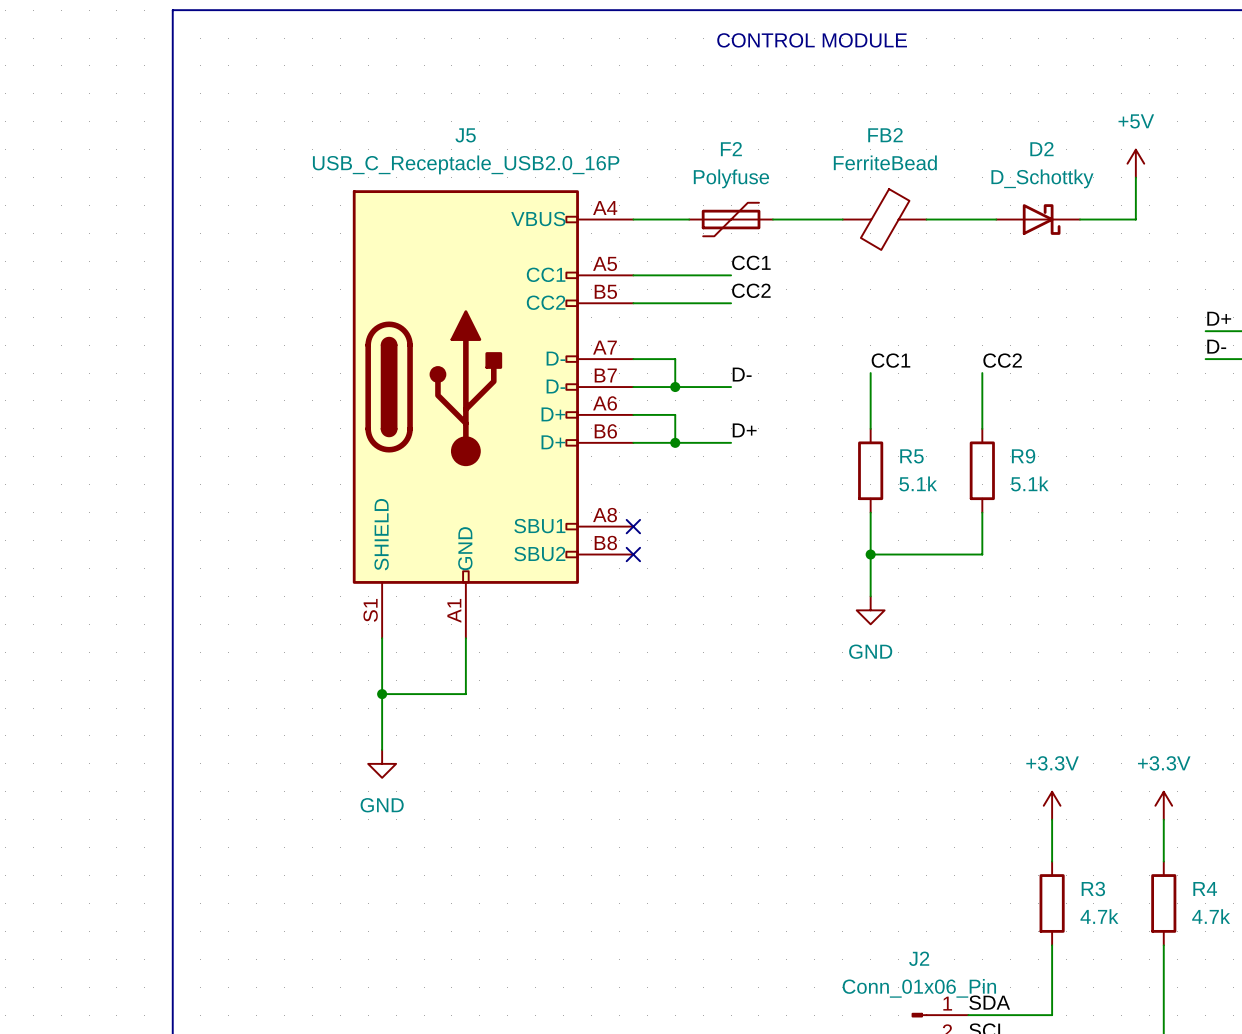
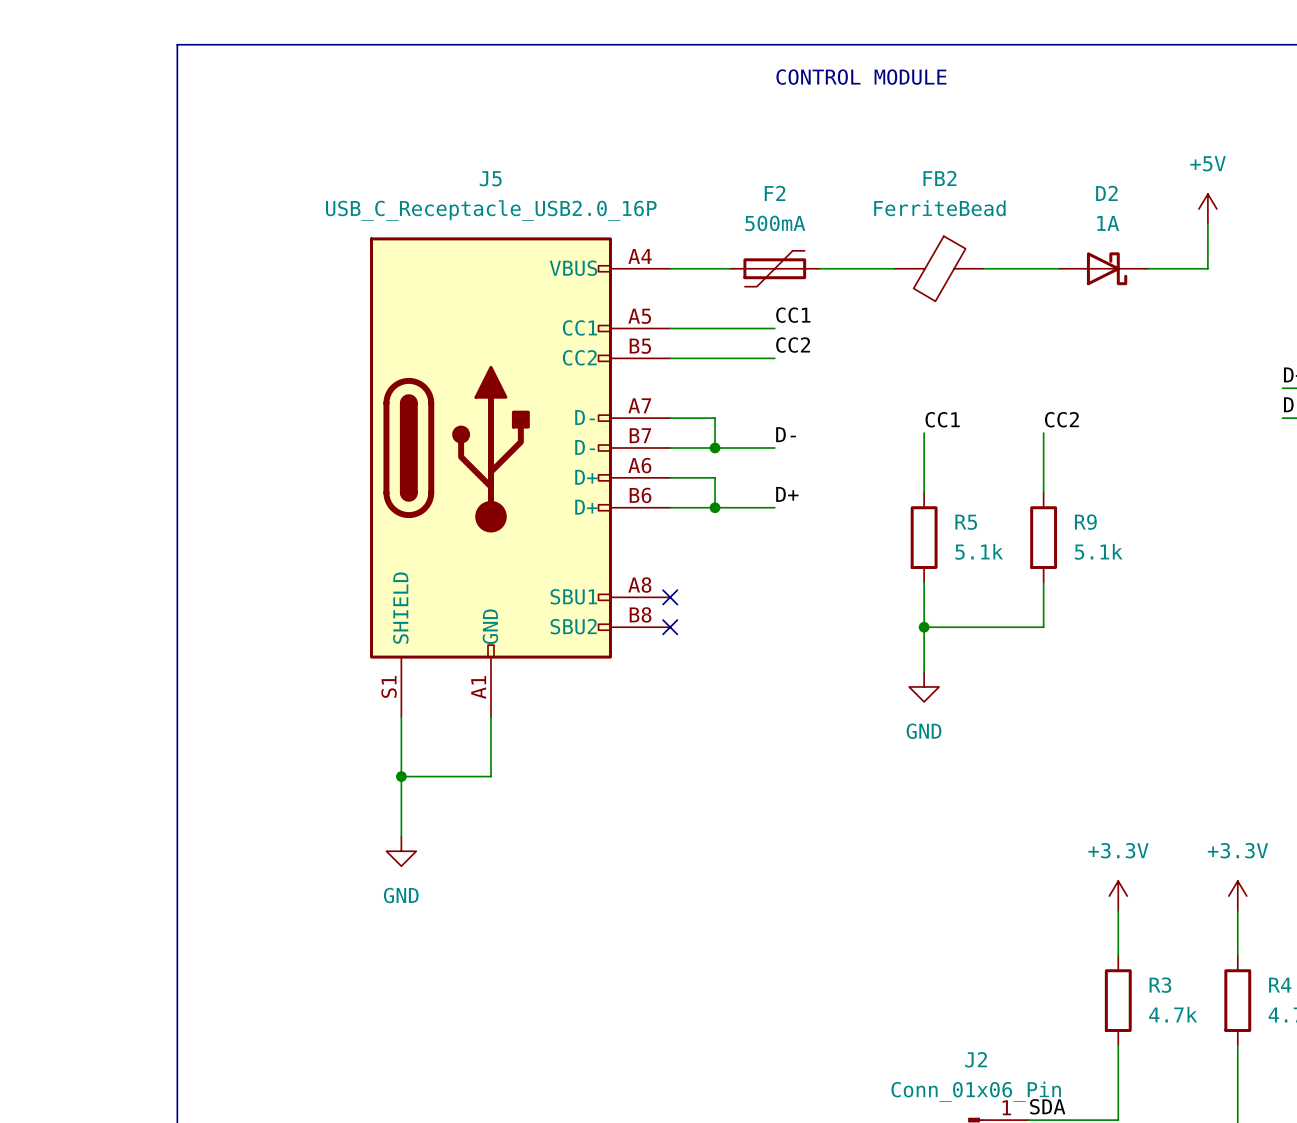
F2 value: Polyfuse (731, 178) -> 500mA (775, 223)
D2 value: D_Schottky (1042, 178) -> 1A (1108, 223)

